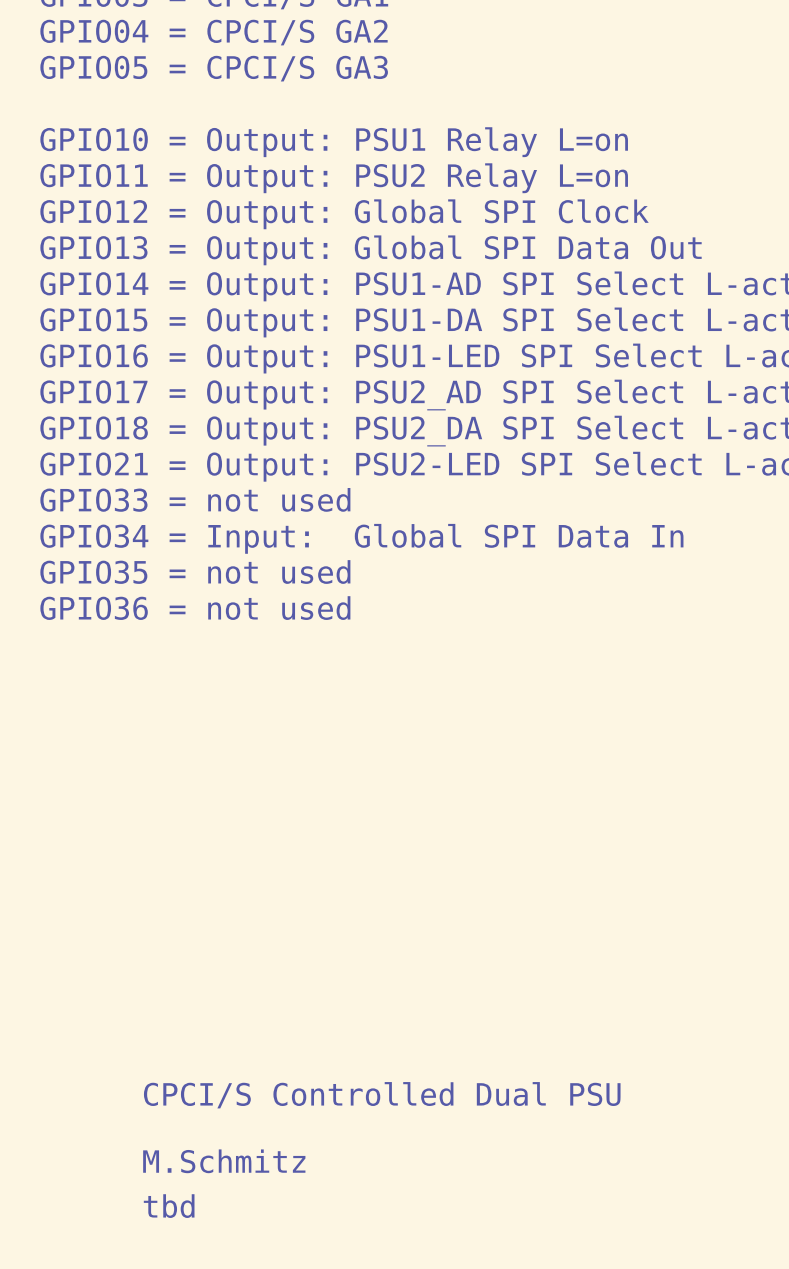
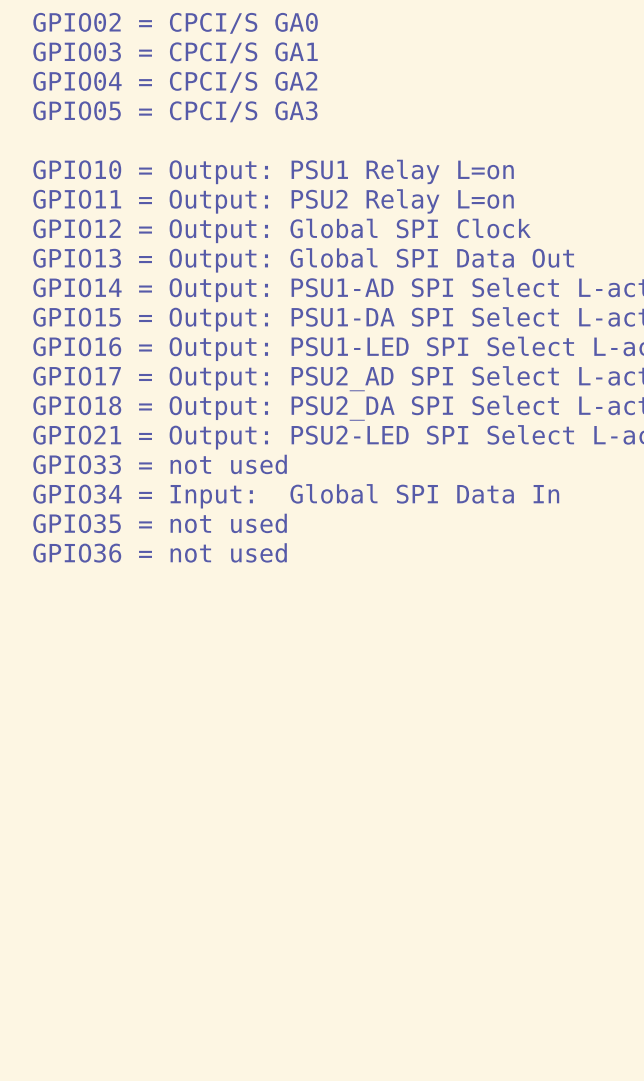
text: CPCI/S Controlled Dual PSU (382, 1095) -> none
text: M.Schmitz (224, 1161) -> none
text: tbd (169, 1206) -> none

